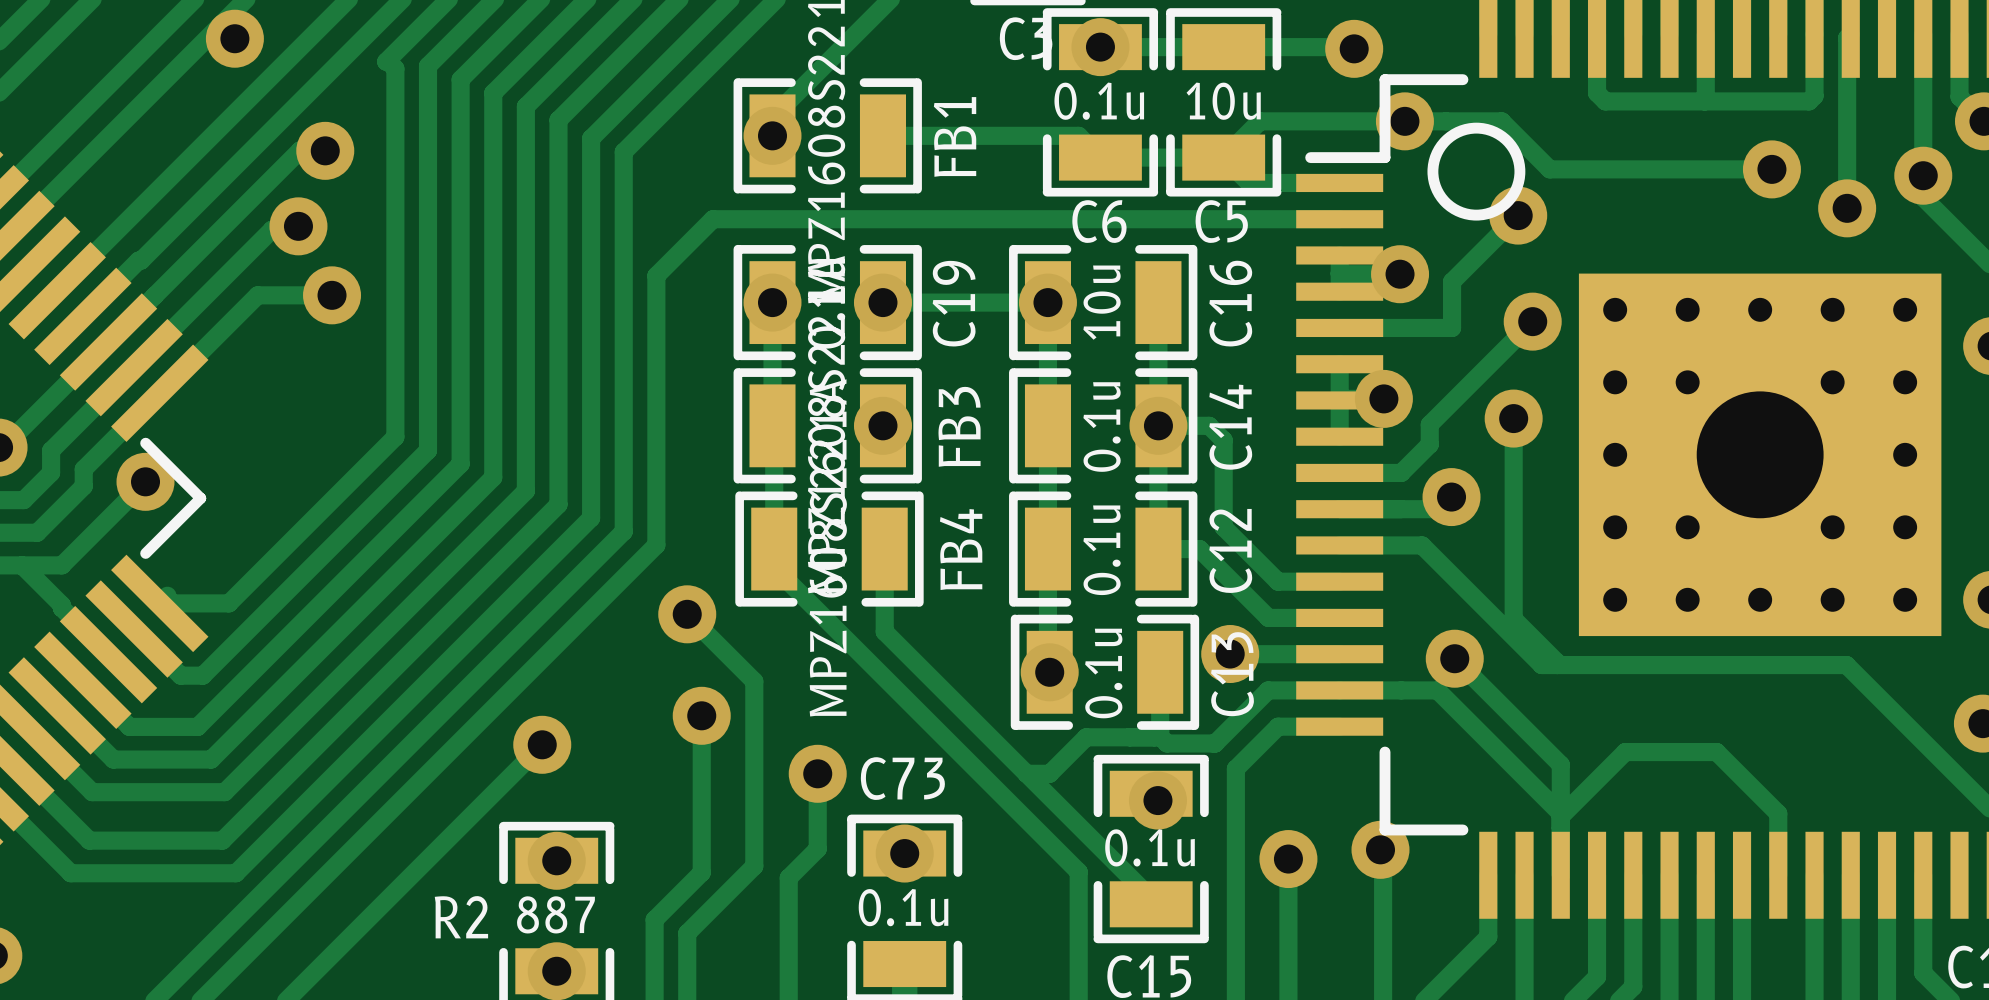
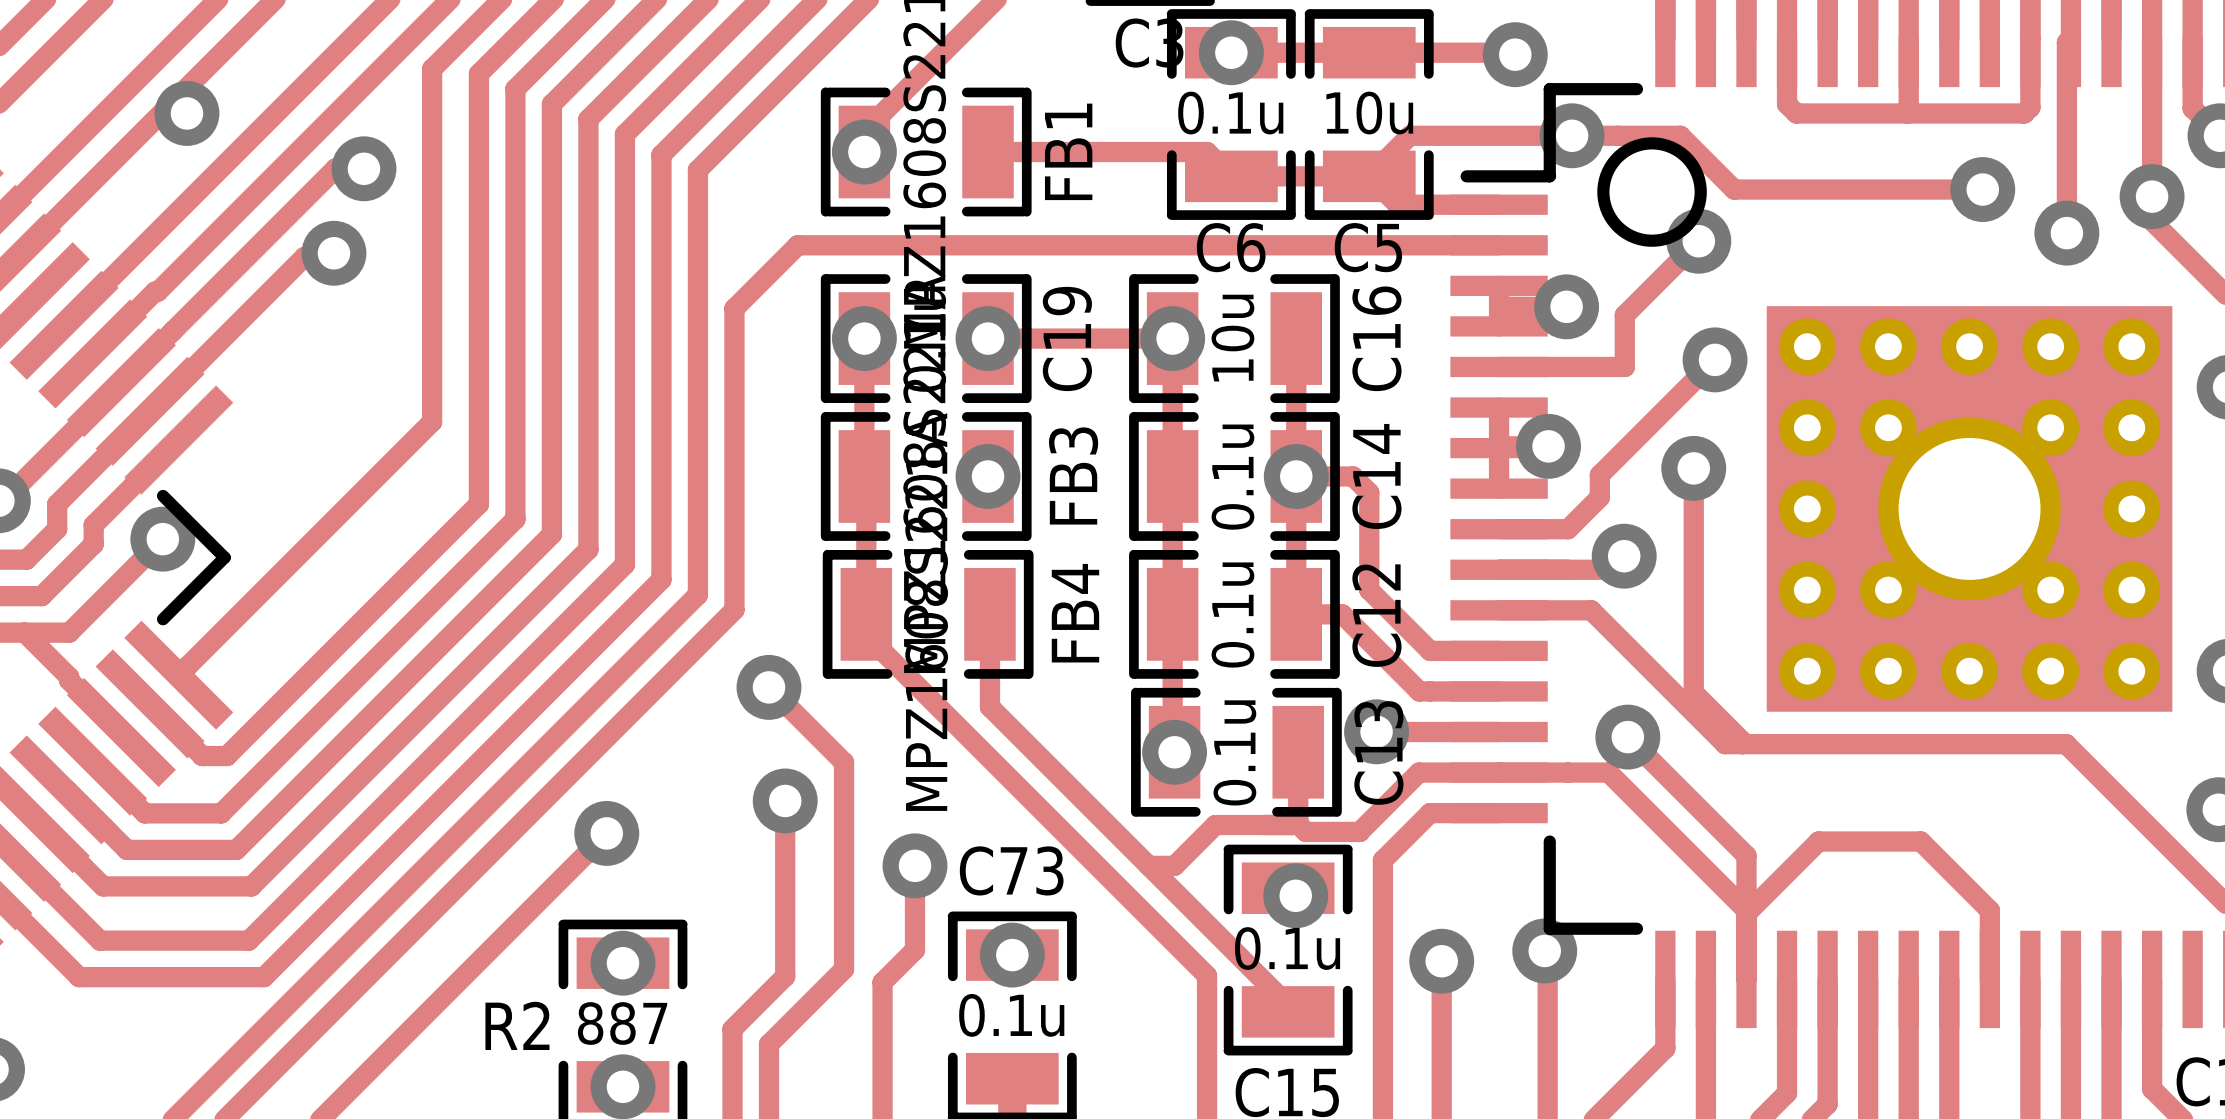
via position: (234, 38) -> (186, 113)
track: (386, 61) (395, 68) (395, 437) (228, 603) (159, 603) -> (432, 69) (432, 421) (187, 666)
track: (332, 295) (257, 295) (159, 393) -> none
via: (332, 295) -> none

